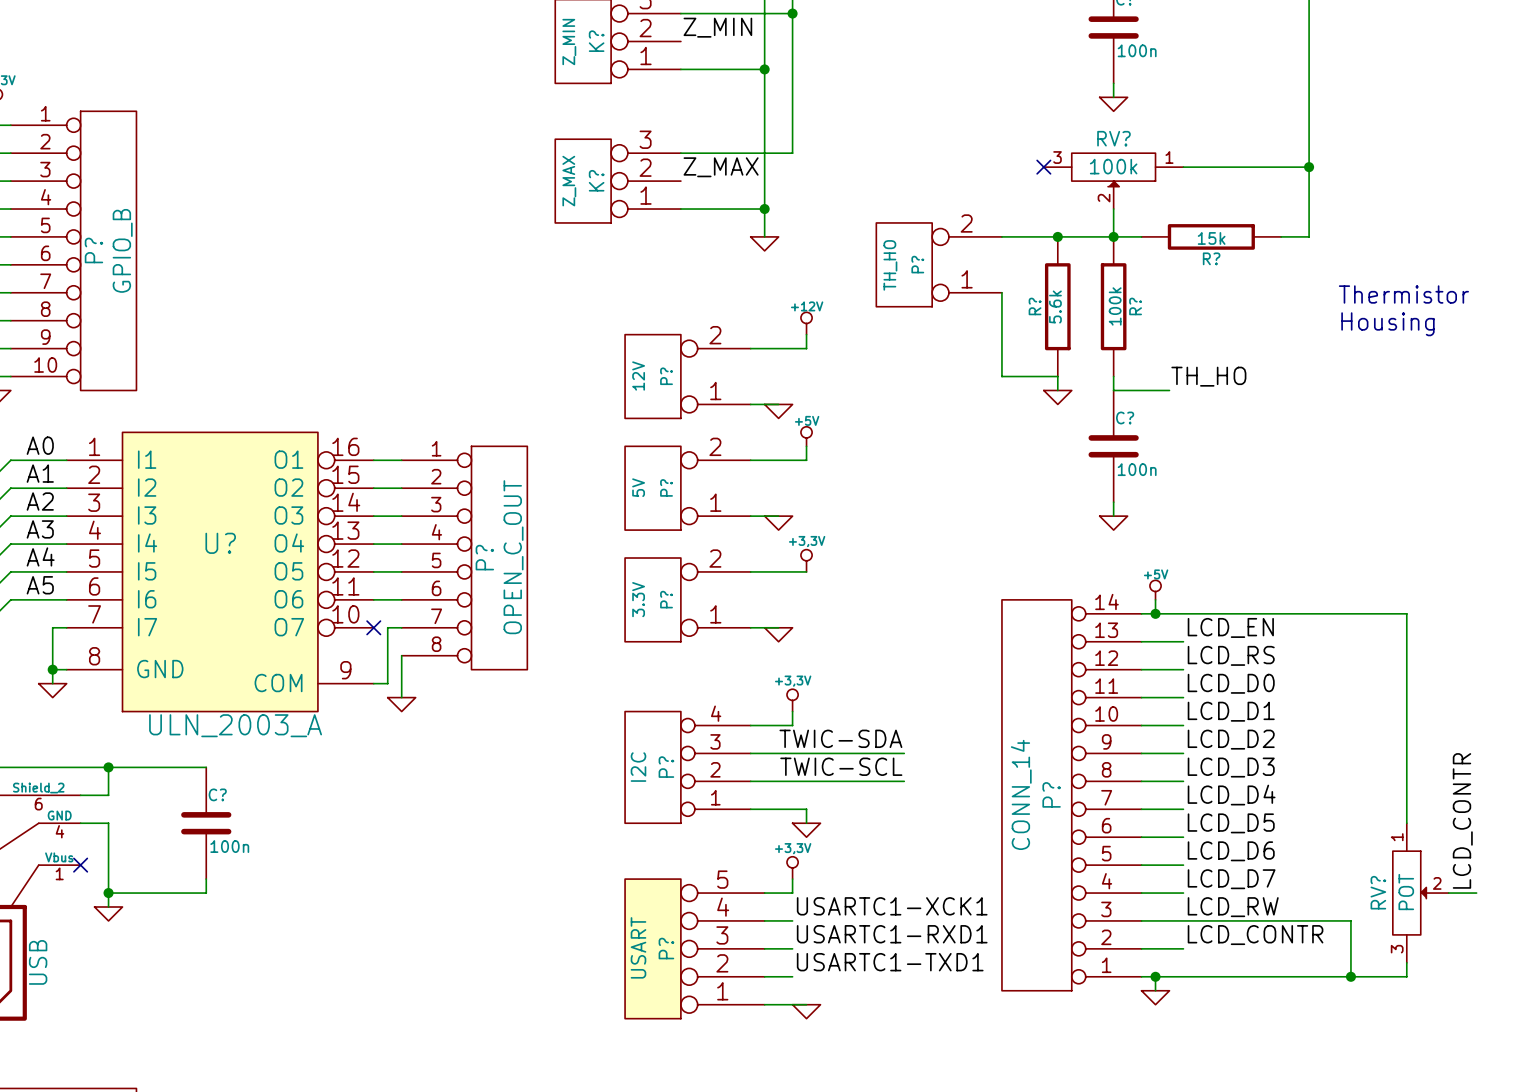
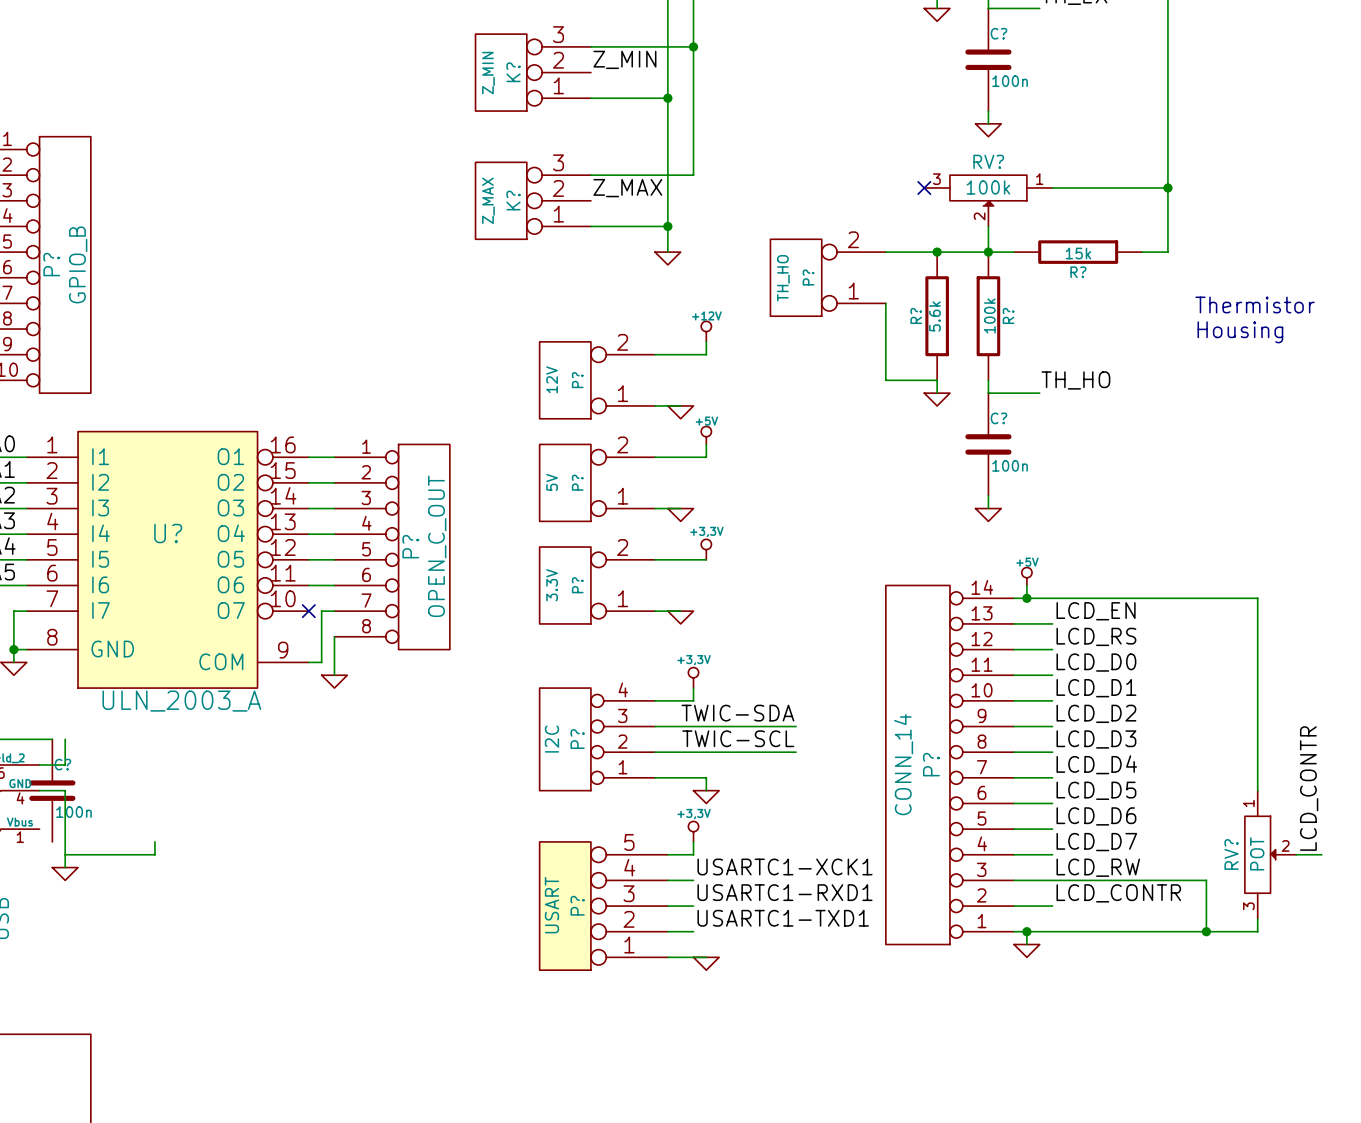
wire: (94, 767) (206, 767) -> none
junction: (108, 767) -> none
C? position: (206, 823) -> (52, 790)
no-connect mark: (80, 865) -> none
junction: (108, 893) -> none

